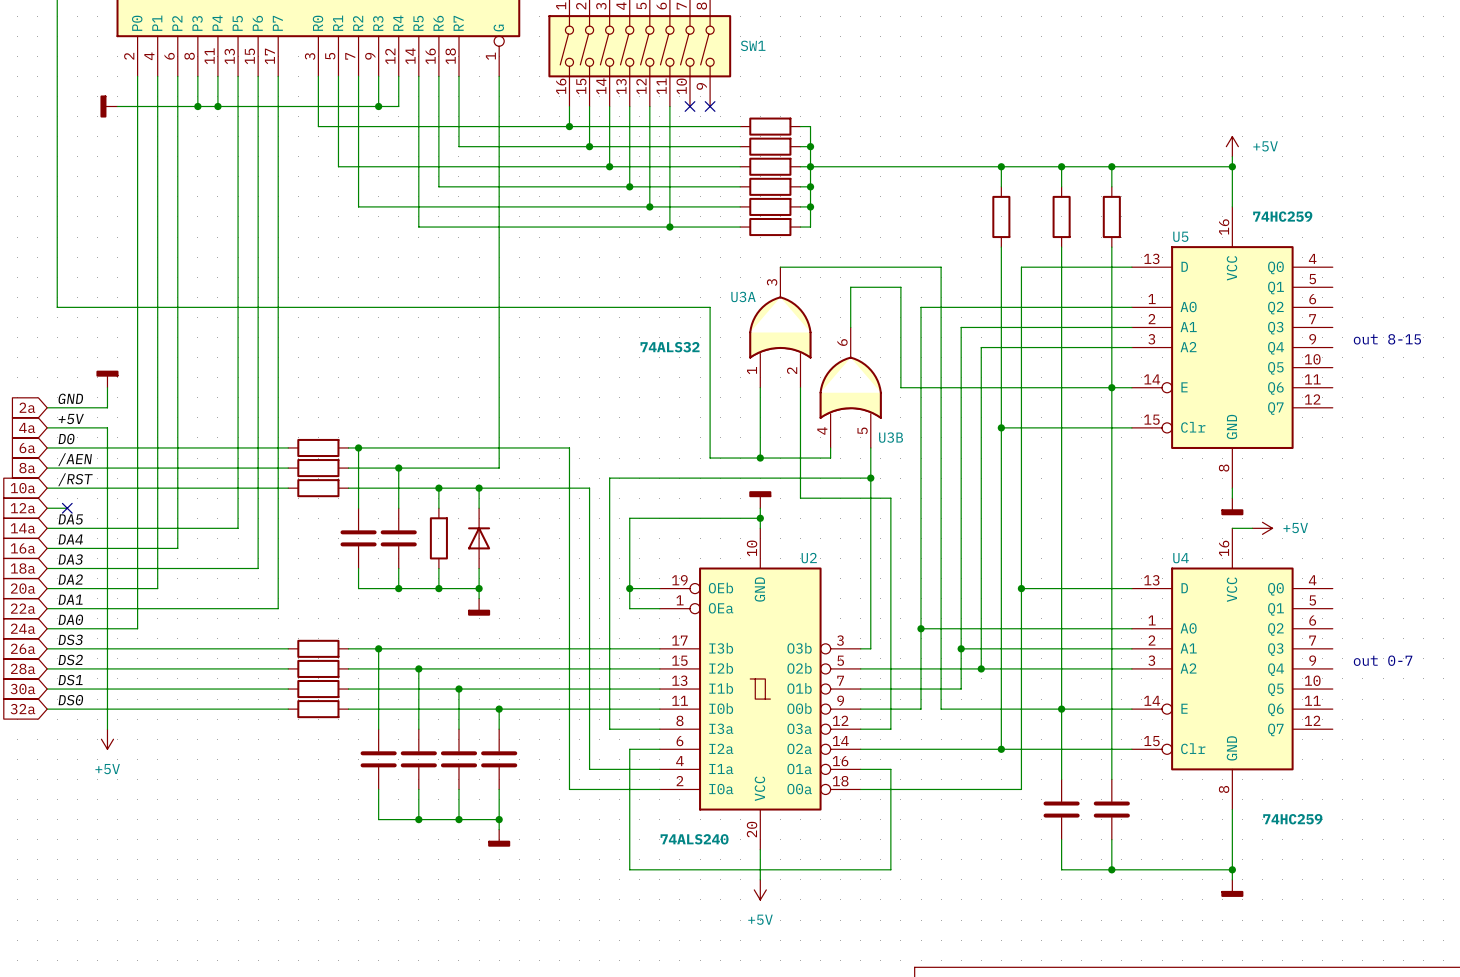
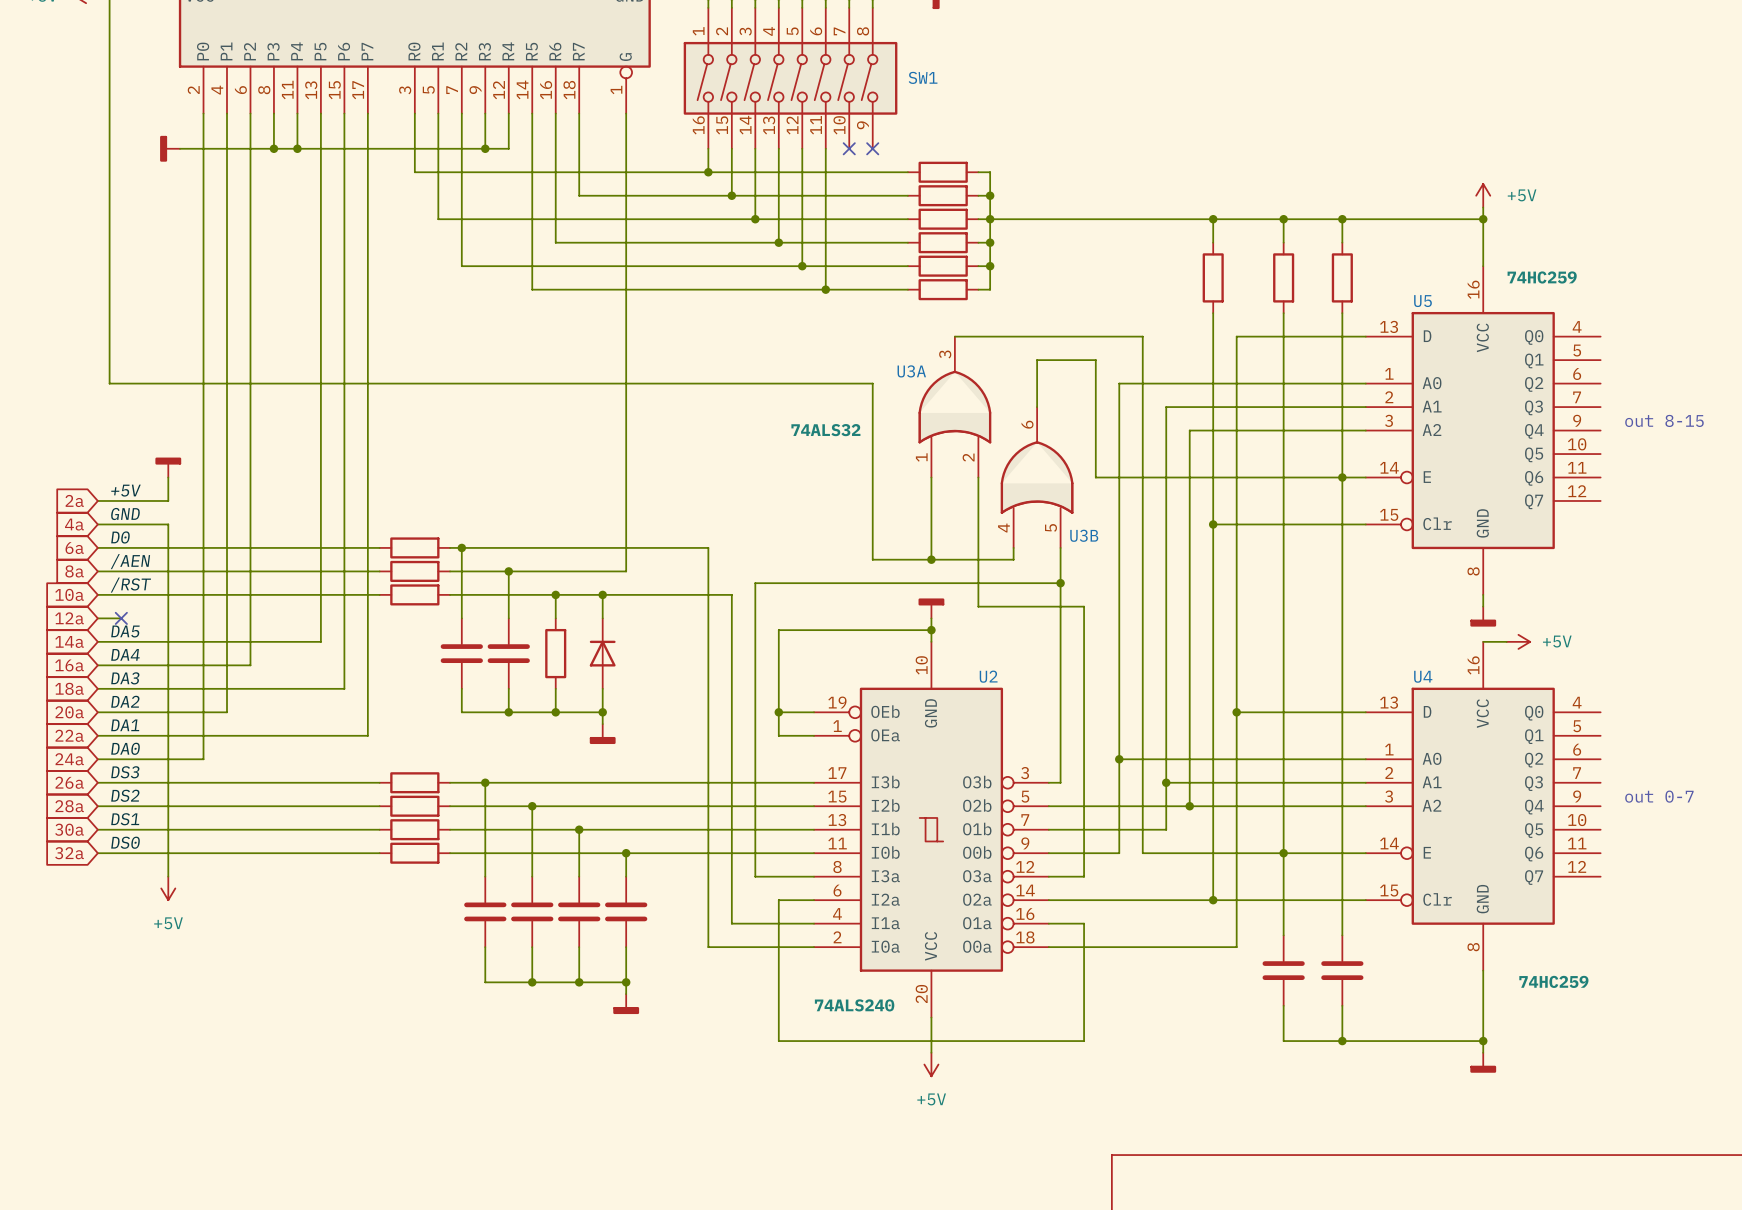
label: GND (70, 398) -> +5V (125, 490)
label: +5V (71, 419) -> GND (125, 513)

